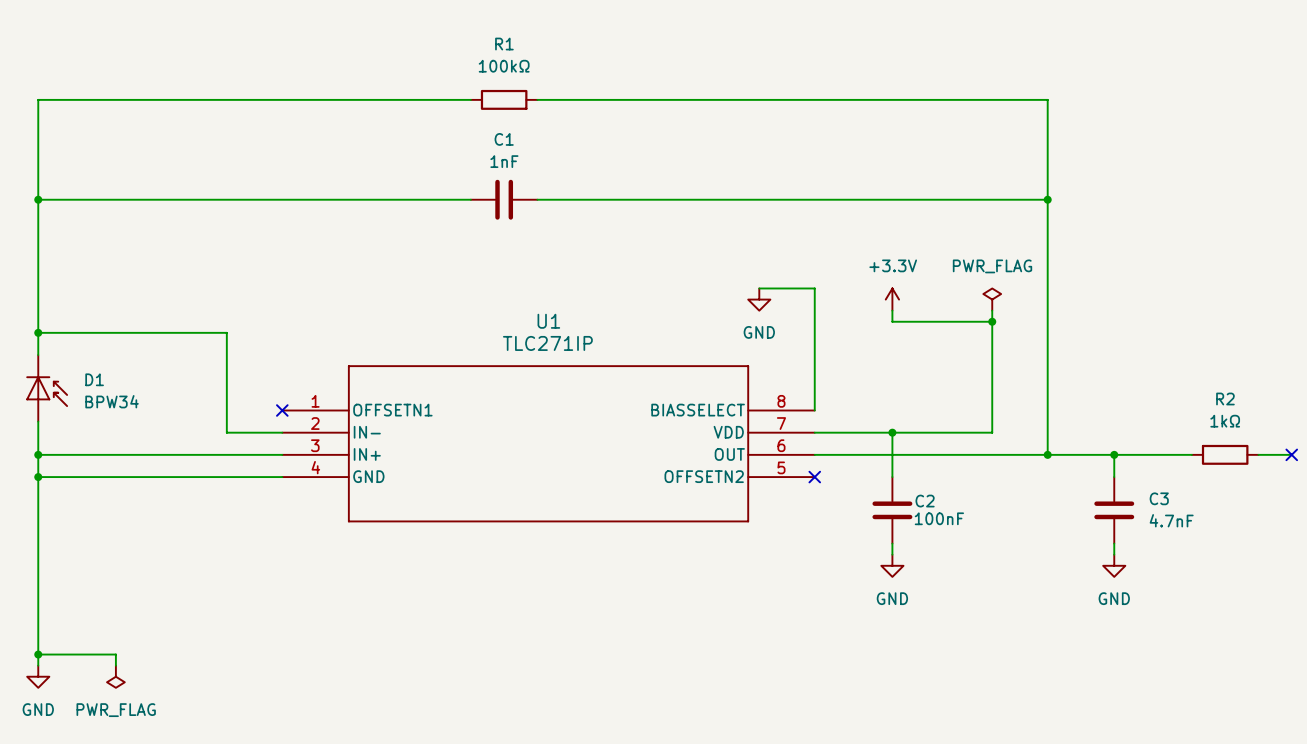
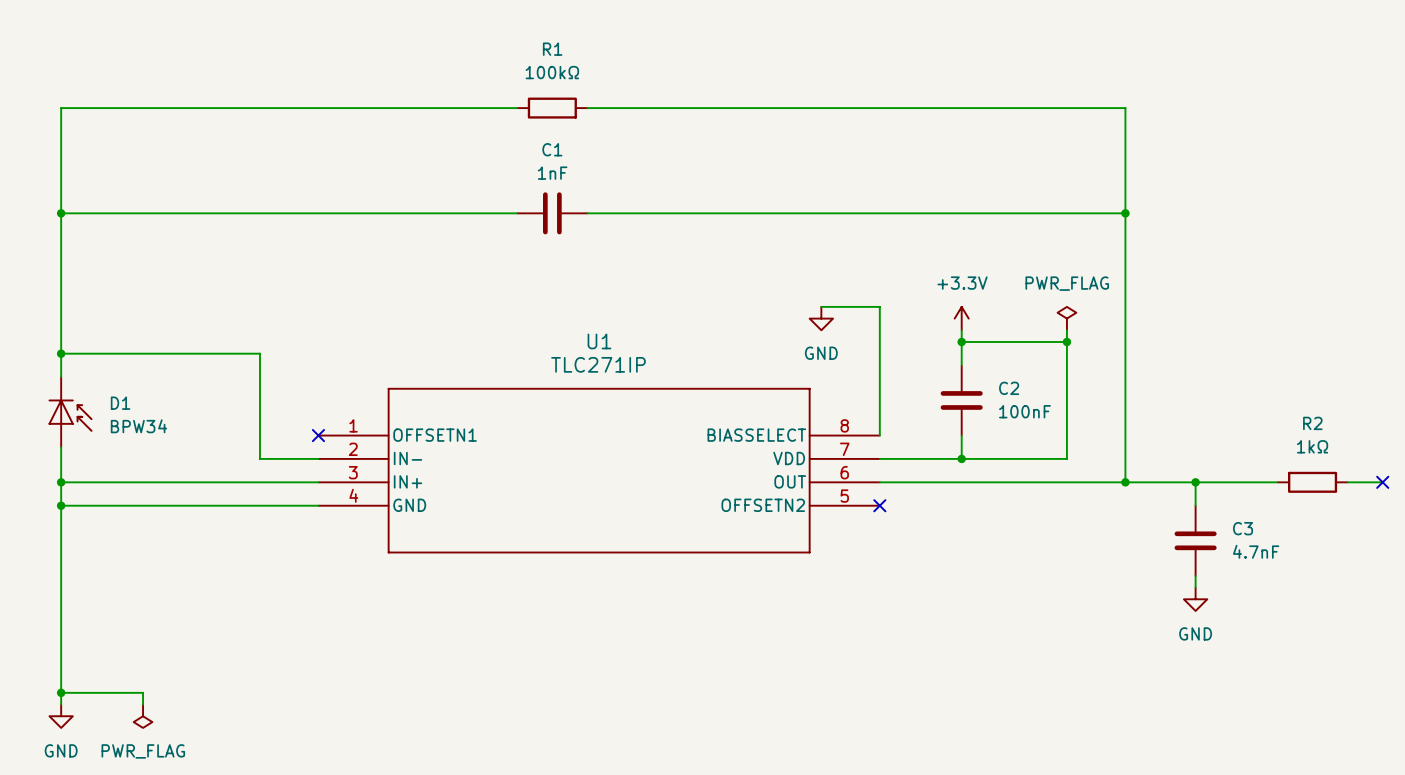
wire: none -> (961, 341) (961, 365)
junction: none -> (961, 341)
wire: (892, 432) (892, 477) -> (961, 458) (961, 435)
C2 name position: C2 (925, 501) -> C2 (1009, 388)
C2 position: (892, 510) -> (961, 400)
C2 value position: 100nF (939, 518) -> 100nF (1024, 411)
wire: (892, 543) (892, 554) -> none
power symbol: GND (892, 565) -> none

